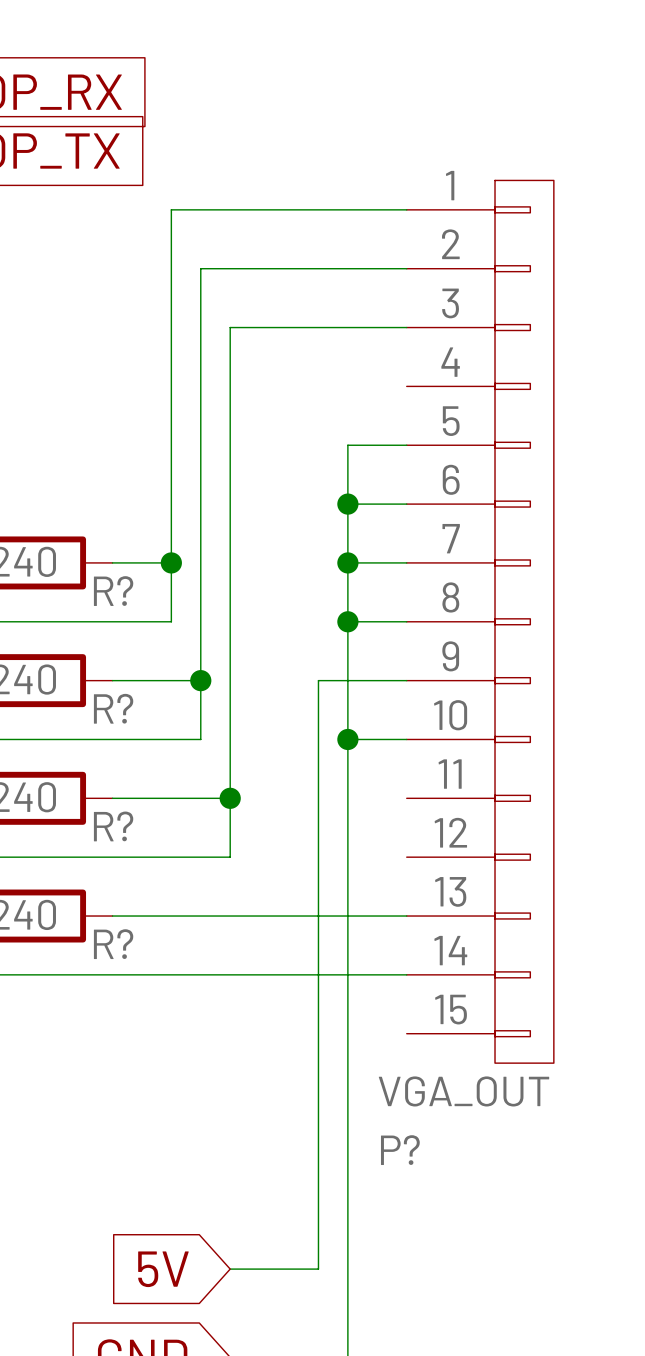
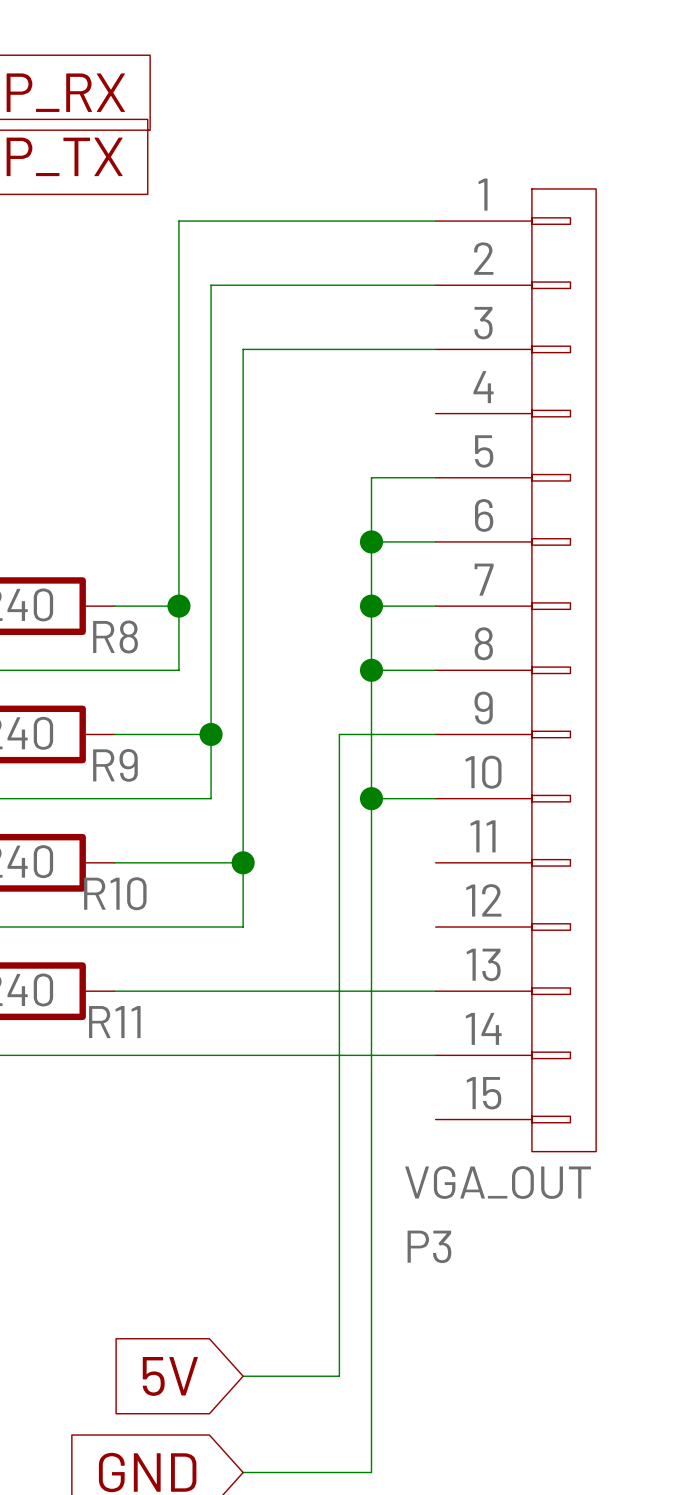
R? name: R? (113, 591) -> R8 (115, 636)
R? name: R? (113, 708) -> R9 (115, 765)
R? name: R? (113, 826) -> R10 (115, 893)
R? name: R? (113, 944) -> R11 (114, 1022)
P? name: P? (400, 1150) -> P3 (429, 1246)

